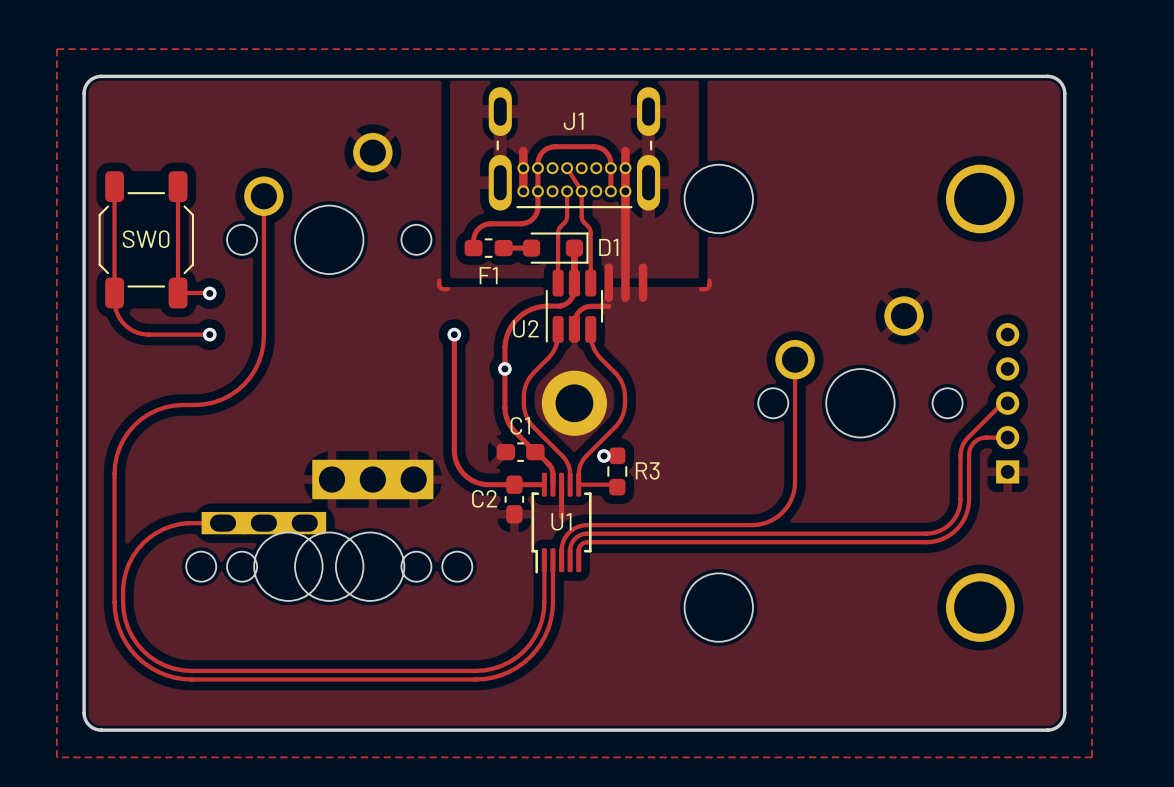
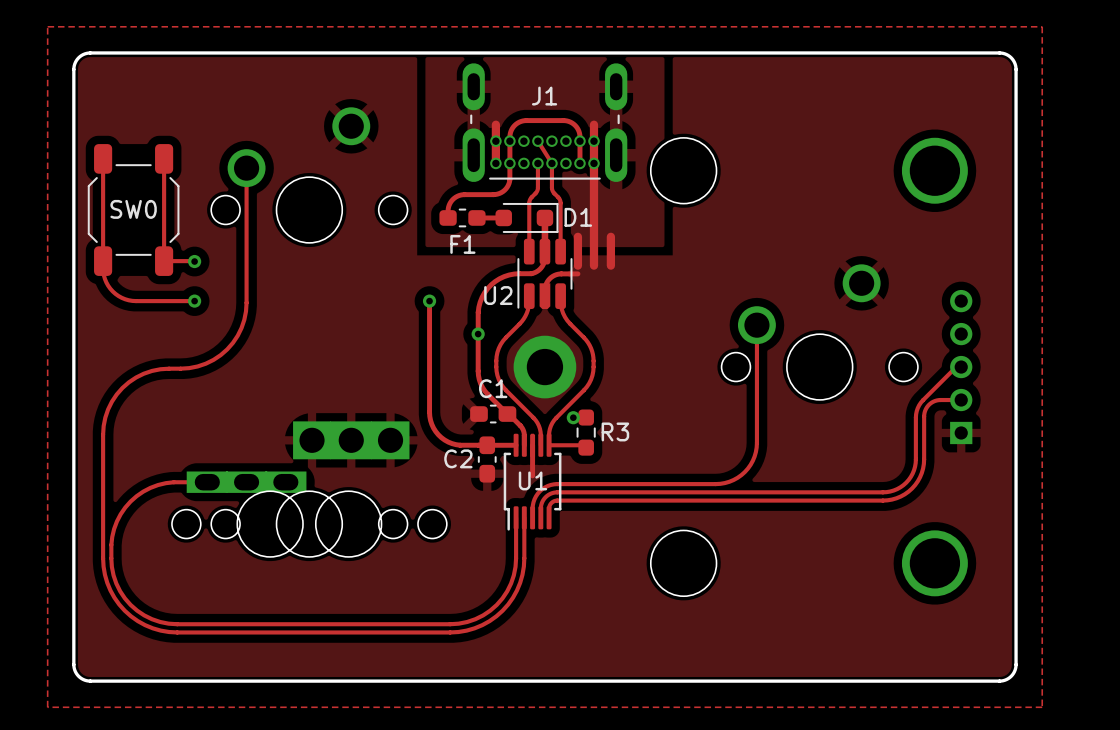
track: (439, 280) (440, 287) (447, 289) -> none
track: (709, 280) (708, 287) (700, 289) -> none

